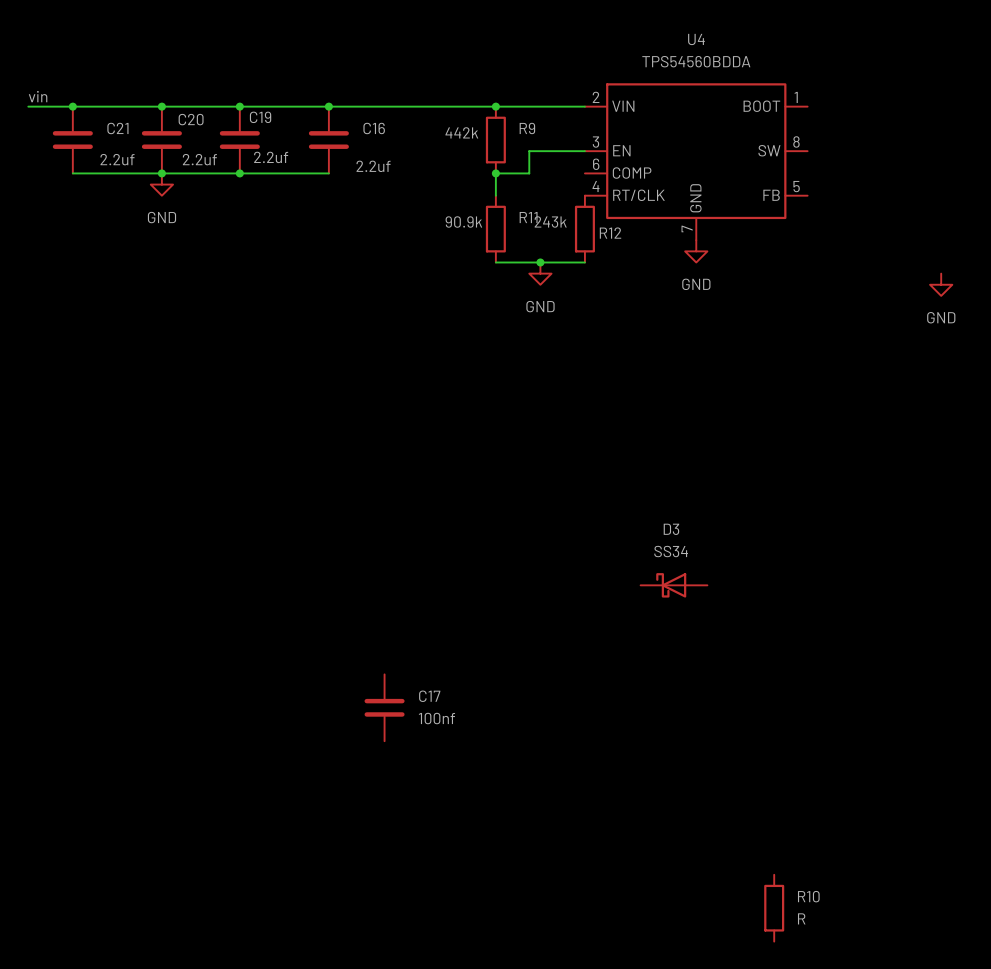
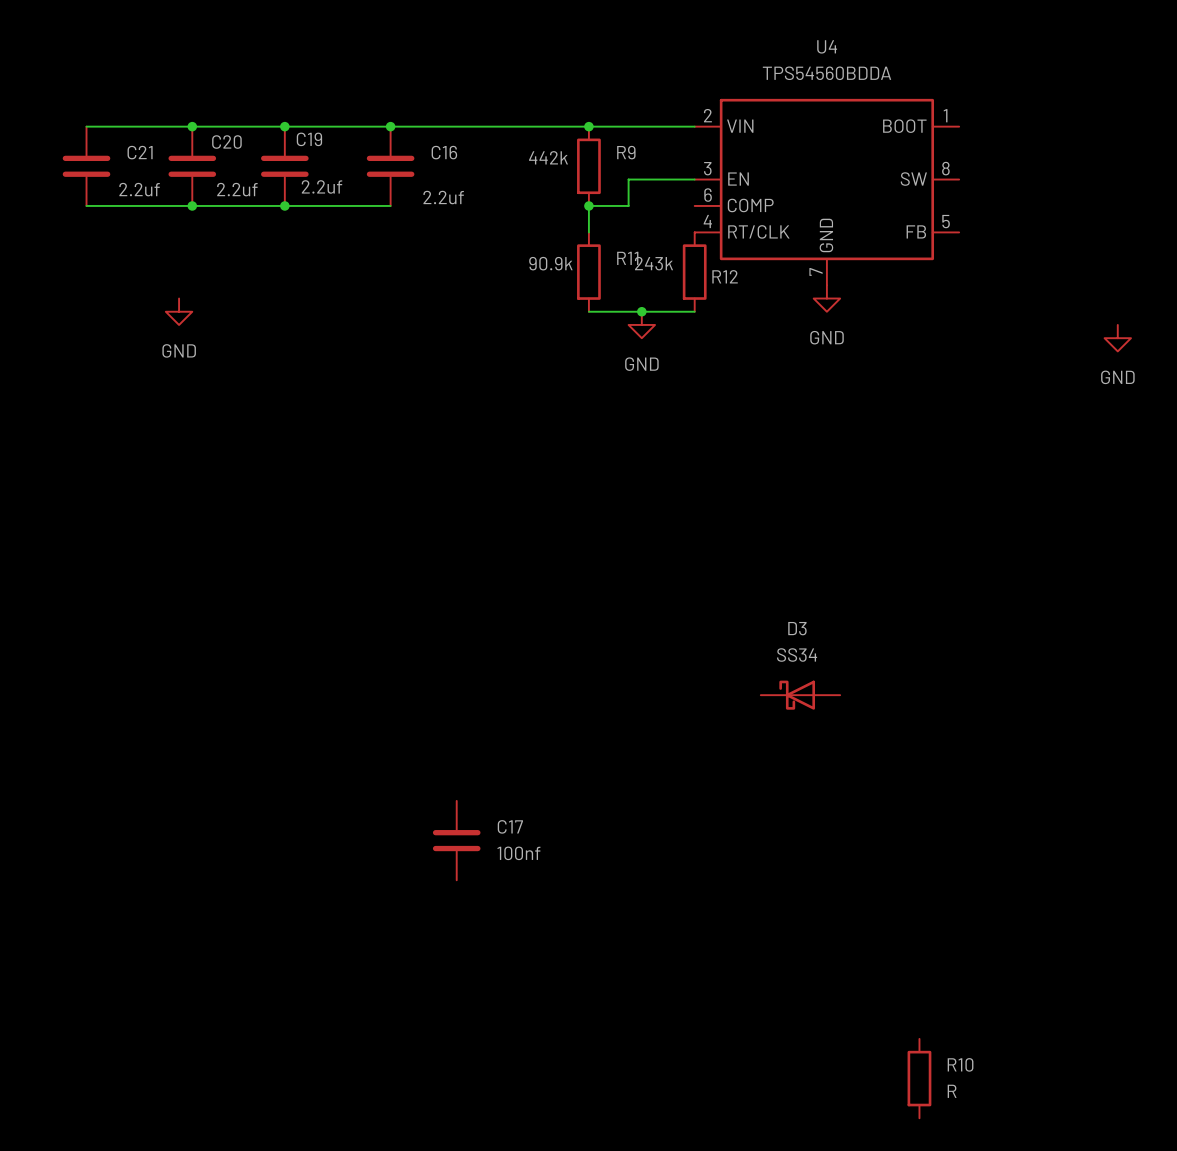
label: vin (38, 96) -> none
wire: (28, 106) (72, 106) -> none
junction: (72, 106) -> none
power symbol position: GND (161, 184) -> GND (179, 311)

